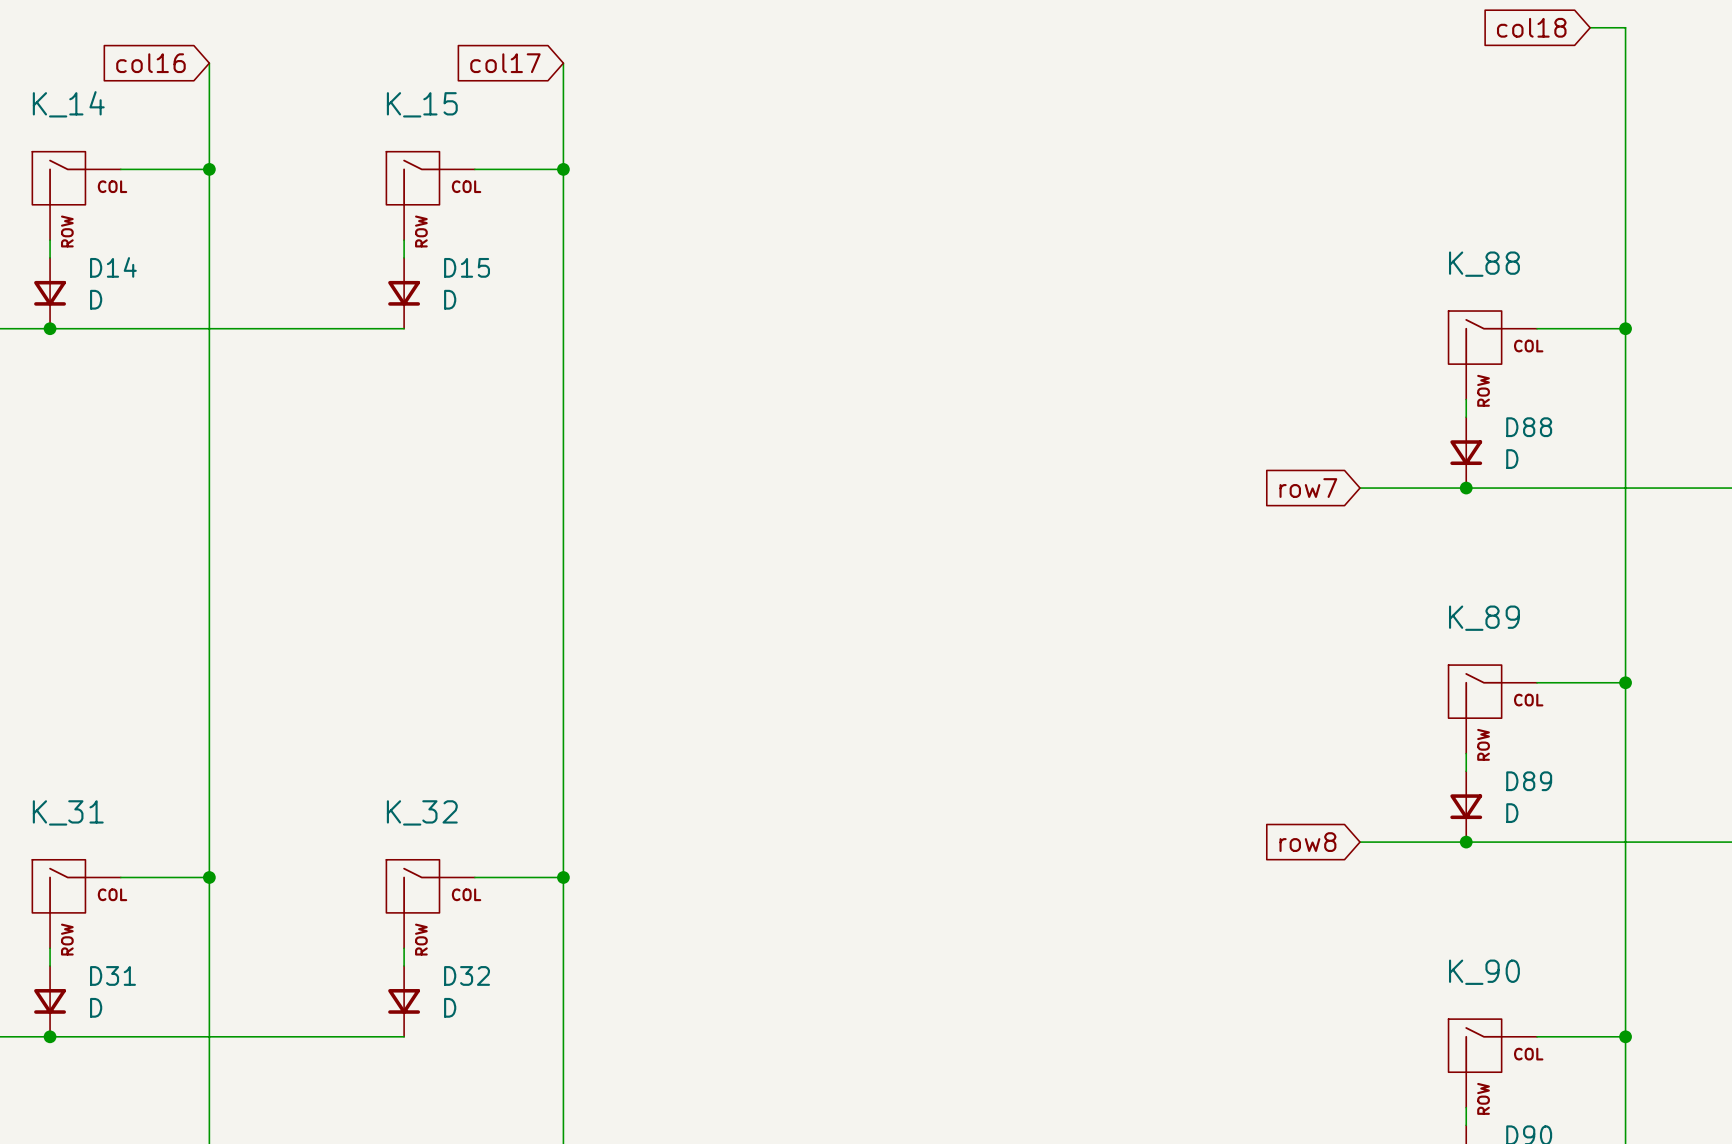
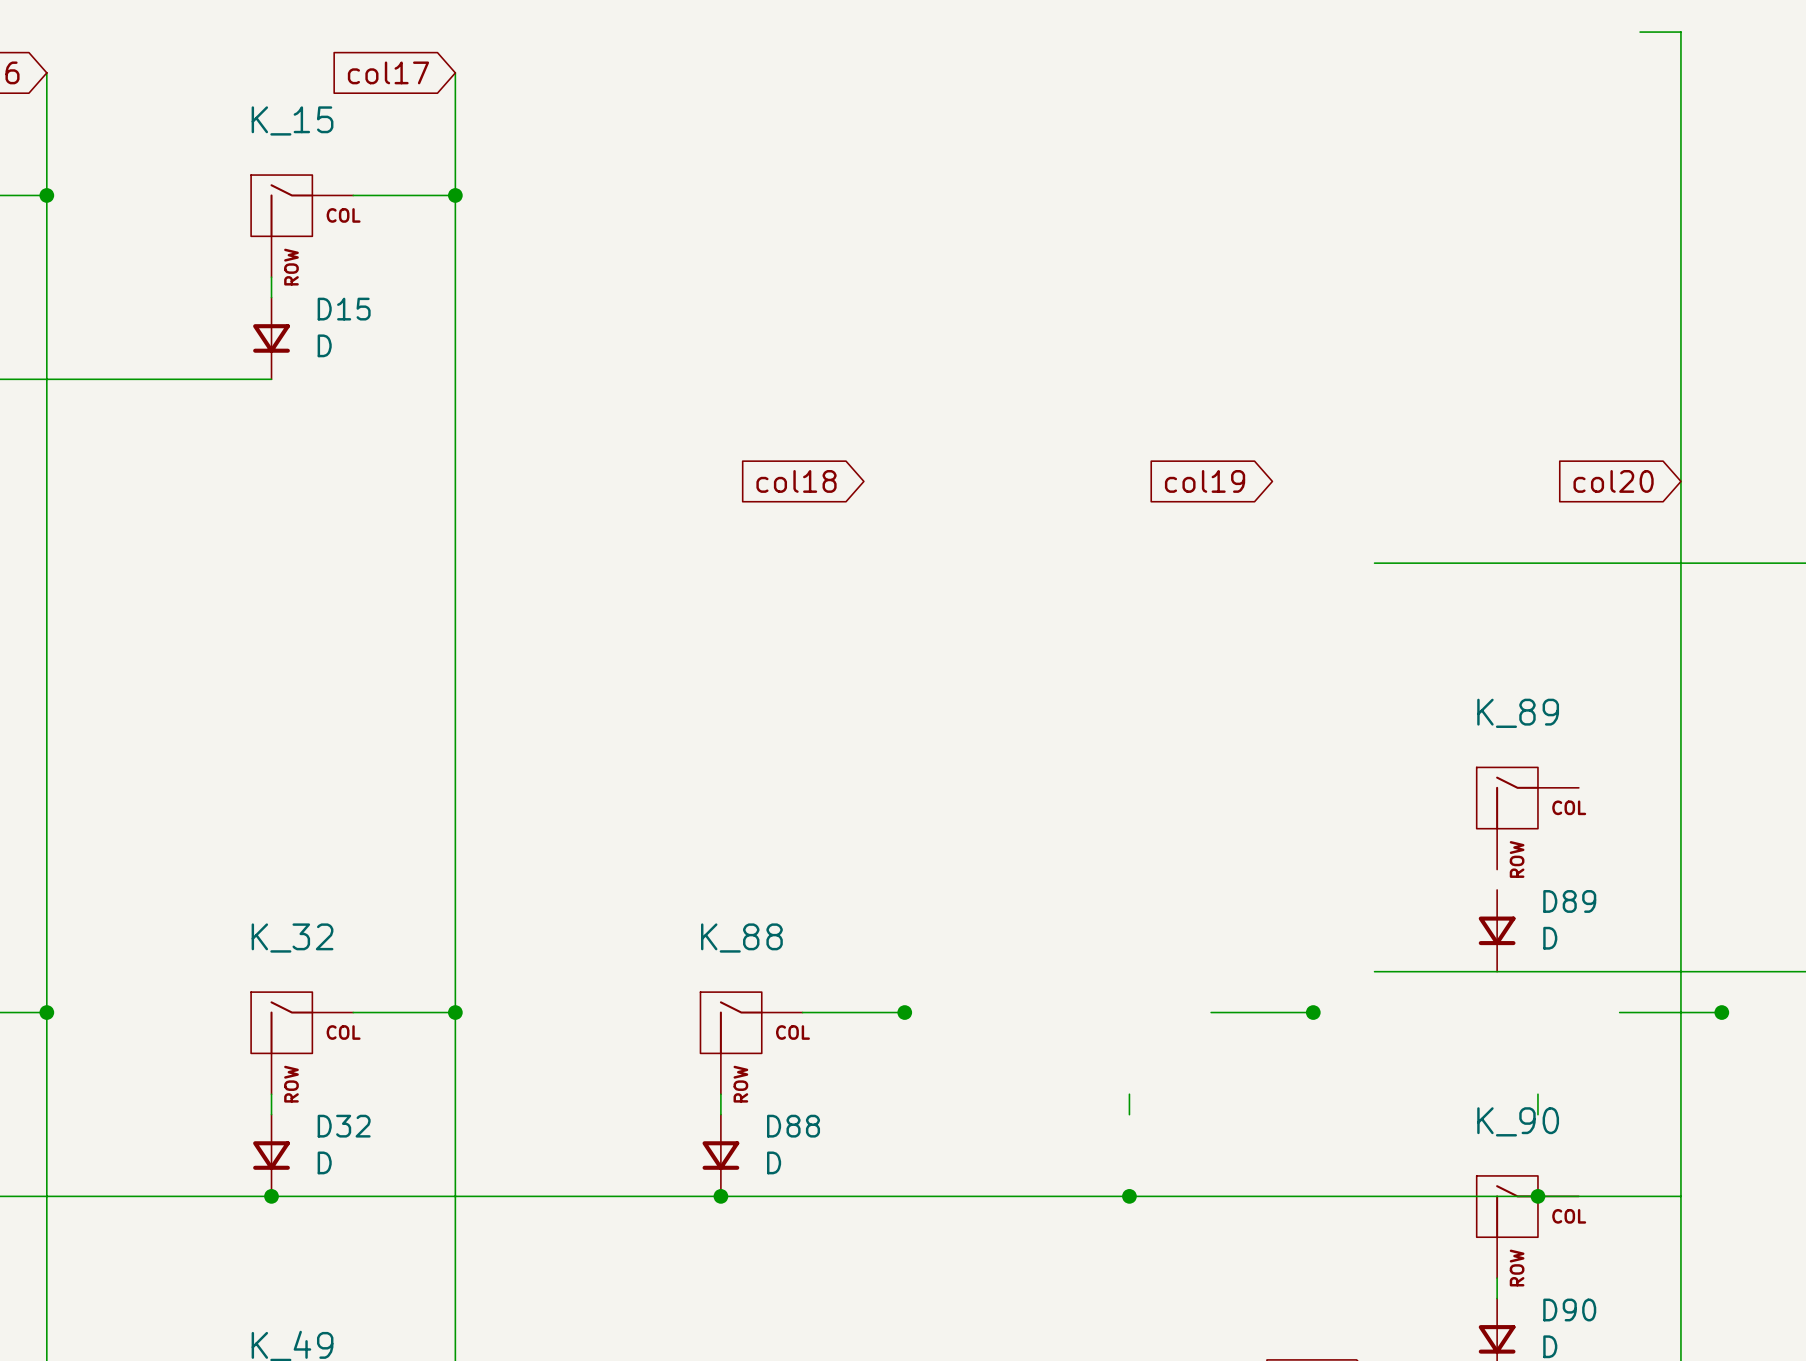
global label: col18 (1531, 27) -> none
wire: (1537, 328) (1625, 328) -> none
junction: (1625, 328) -> none
K_88 position: (1492, 355) -> (751, 1043)
wire: (1466, 399) (1466, 417) -> none
global label: none -> col18 (796, 481)
global label: none -> col19 (1205, 481)
global label: none -> col20 (1613, 481)
D88 position: (1466, 452) -> (720, 1155)
global label: row7 (1308, 488) -> none
junction: (1466, 488) -> none
wire: (1537, 682) (1625, 682) -> (1619, 1012) (1721, 1012)
junction: (1625, 682) -> none
wire: (1466, 753) (1466, 771) -> (1537, 1094) (1537, 1114)
global label: row8 (1307, 842) -> none
junction: (1466, 842) -> none
wire: none -> (802, 1012) (904, 1012)
junction: none -> (904, 1012)
wire: none -> (1211, 1012) (1313, 1012)
junction: none -> (1313, 1012)
junction: none -> (1721, 1012)
wire: none -> (720, 1094) (720, 1114)
wire: none -> (1129, 1094) (1129, 1114)
wire: none -> (271, 1196) (1578, 1196)
junction: none -> (271, 1196)
junction: none -> (720, 1196)
junction: none -> (1129, 1196)
junction: none -> (1537, 1196)
junction: (1625, 1036) -> none

